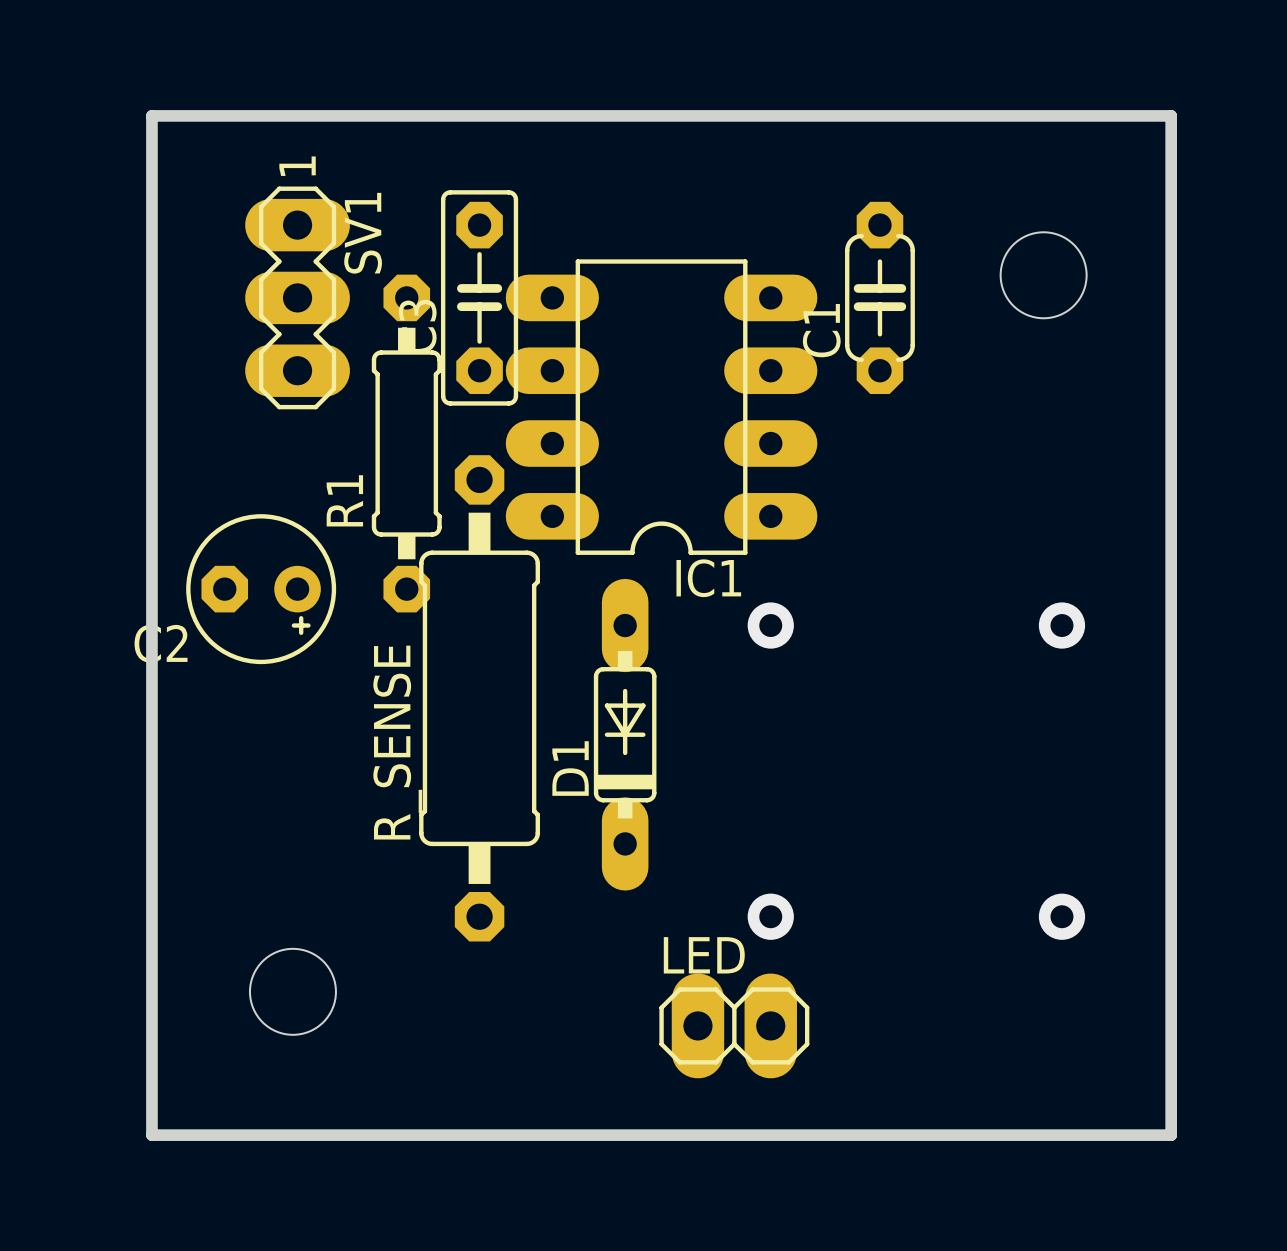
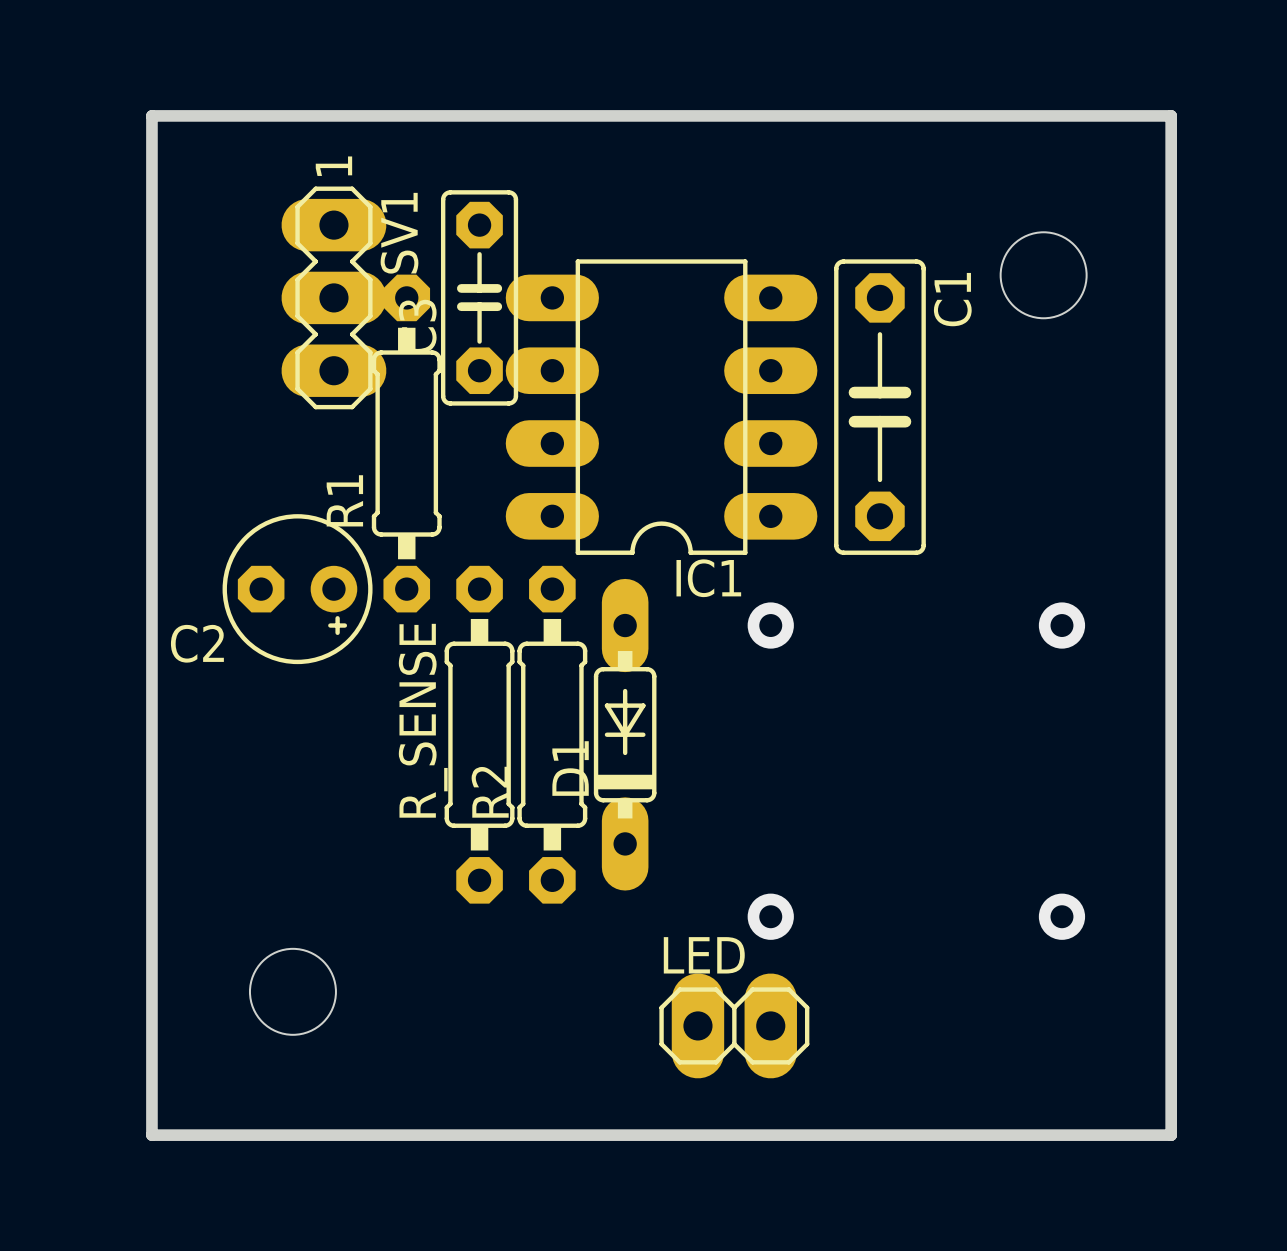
C1 footprint: [845, 201, 915, 395] -> [834, 259, 926, 555]
SV1 position: (297, 297) -> (333, 297)
C1 name position: C1 (821, 330) -> C1 (952, 299)
C2 position: (261, 589) -> (297, 589)
R_SENSE: (479, 698) -> none
R_SENSE: none -> (479, 734)
R2: none -> (552, 734)

